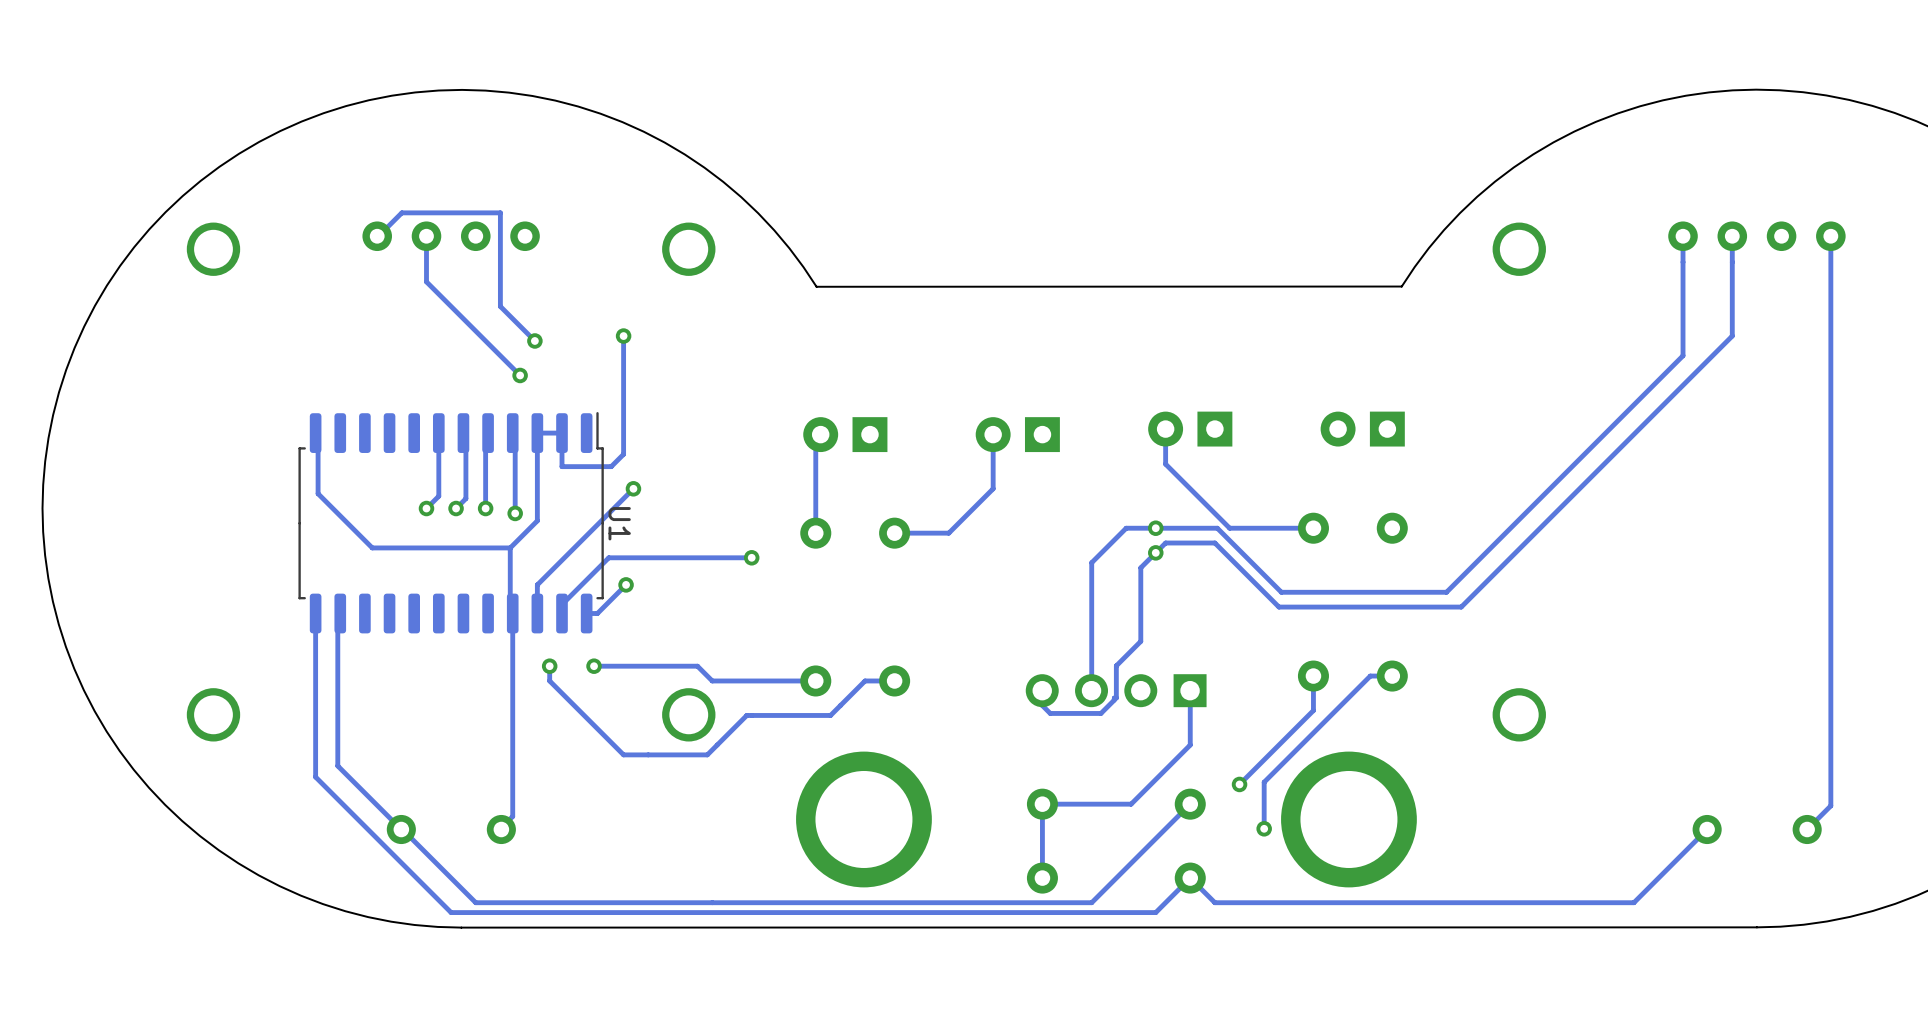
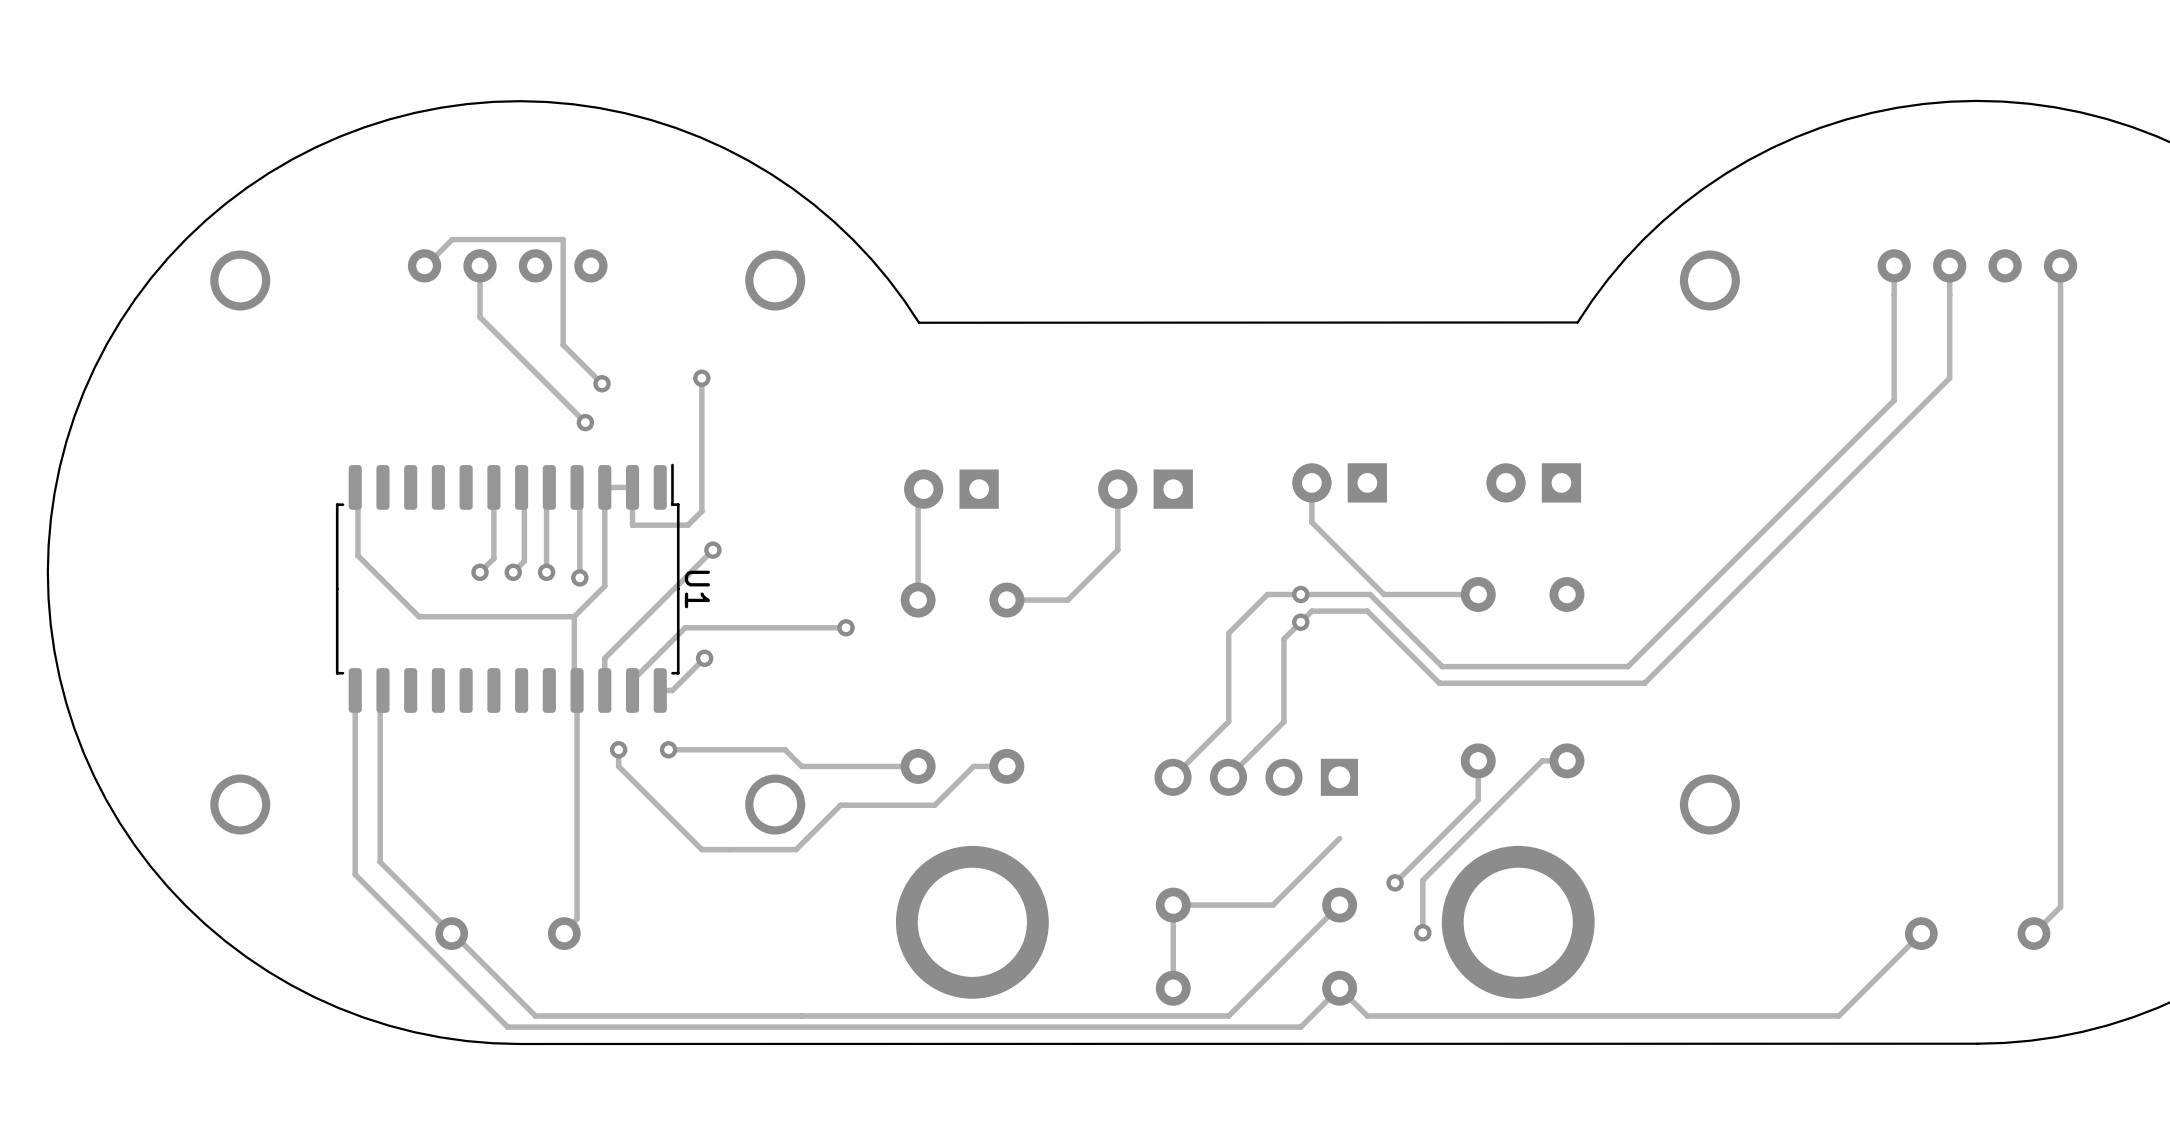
track: (1091, 641) (1091, 695) -> (1228, 721) (1173, 777)
track: (1116, 665) (1116, 698) (1100, 713) (1050, 713) (1042, 705) (1042, 680) -> (1256, 749) (1228, 777)
track: (1190, 695) (1190, 745) -> none

